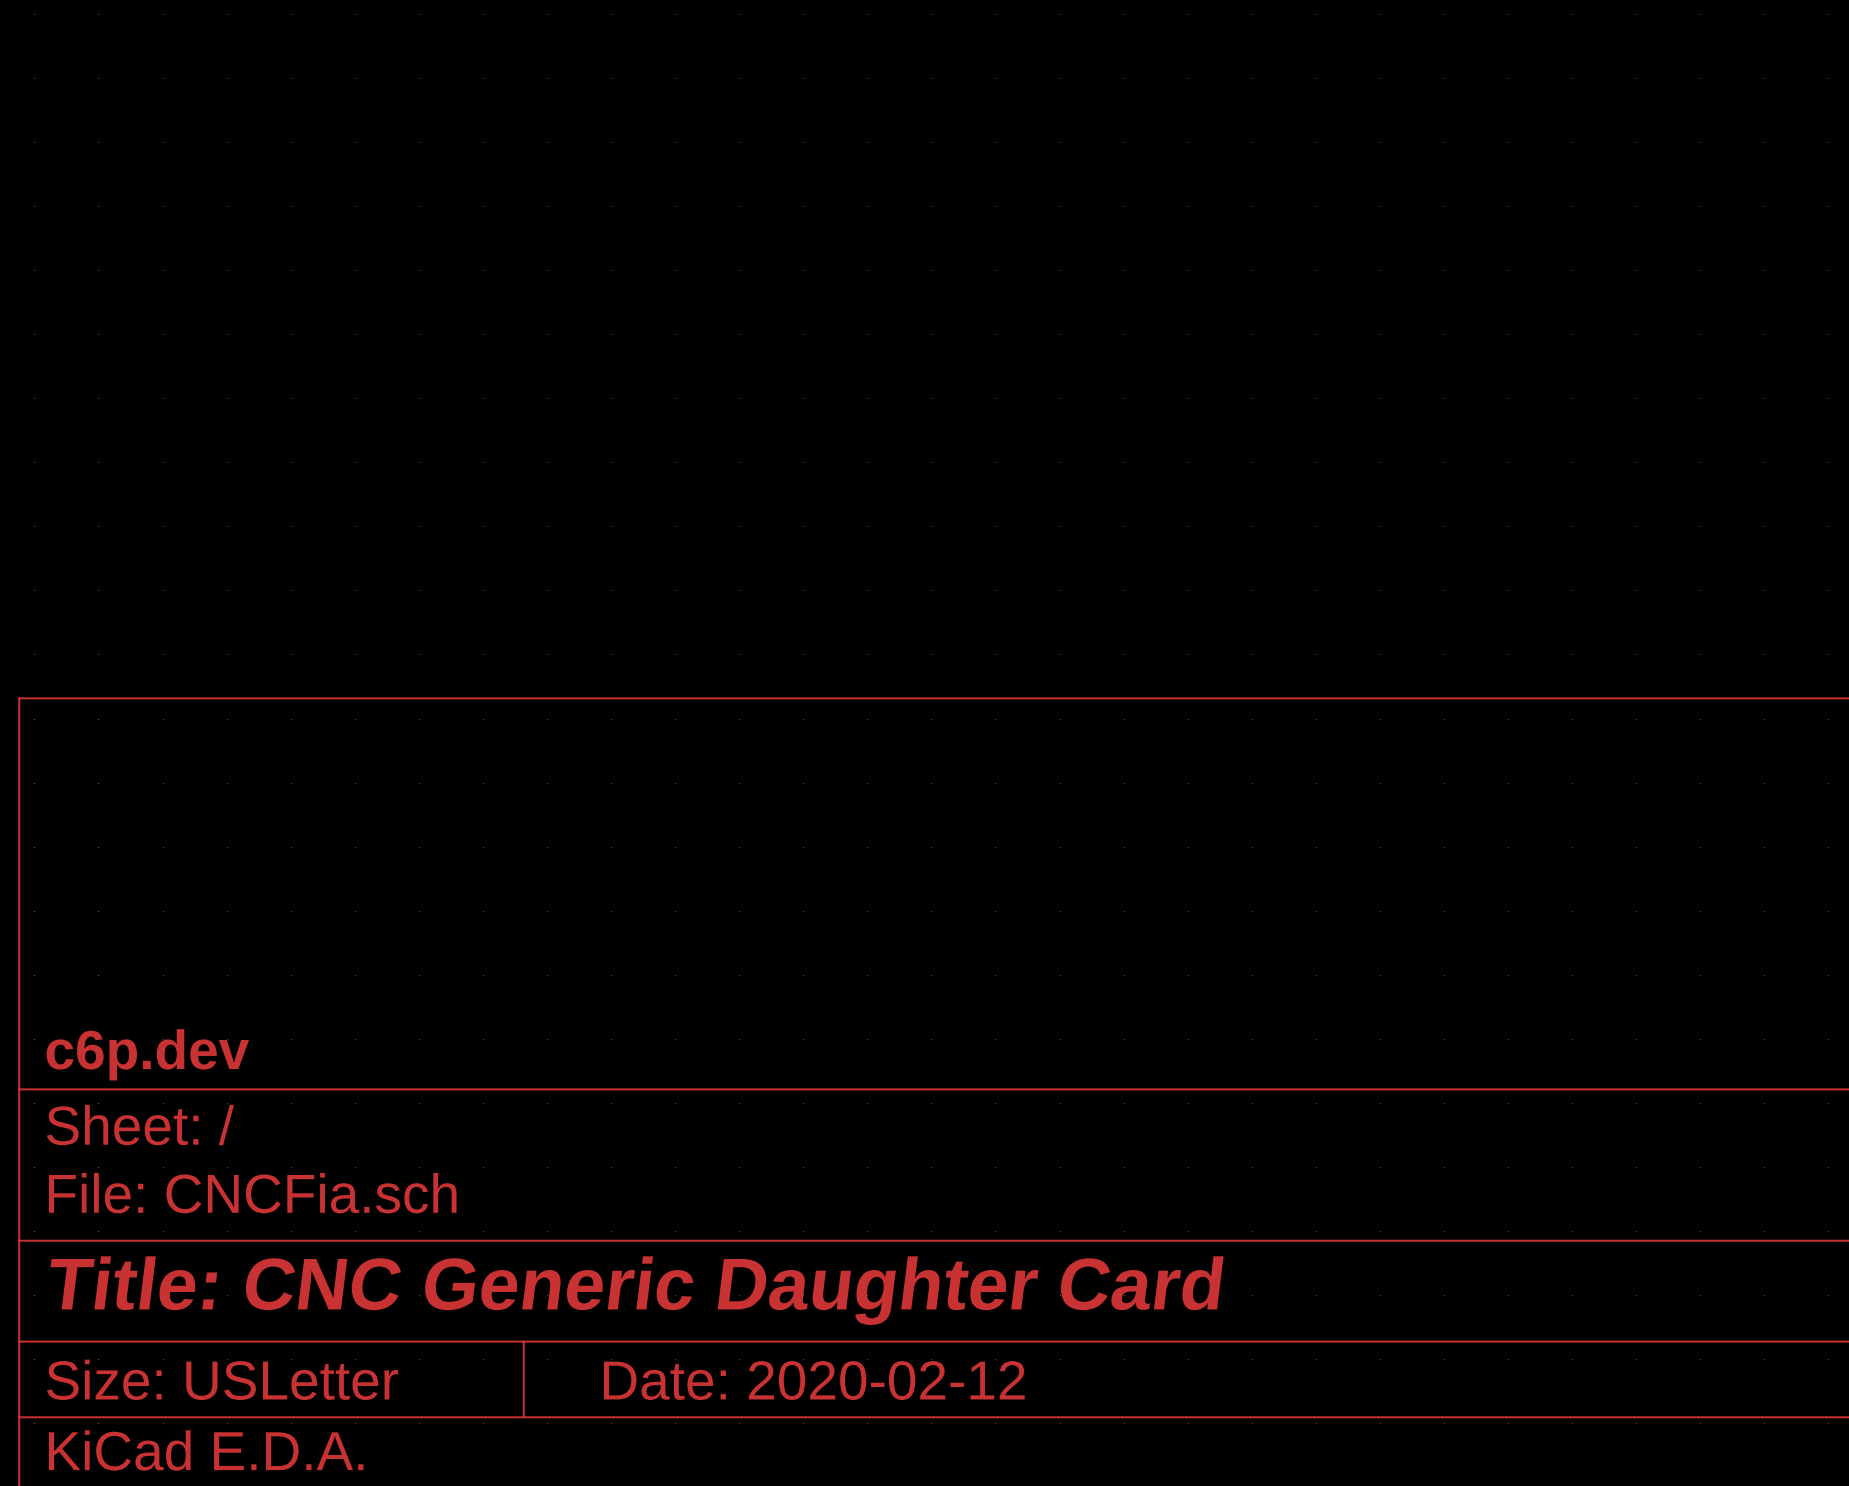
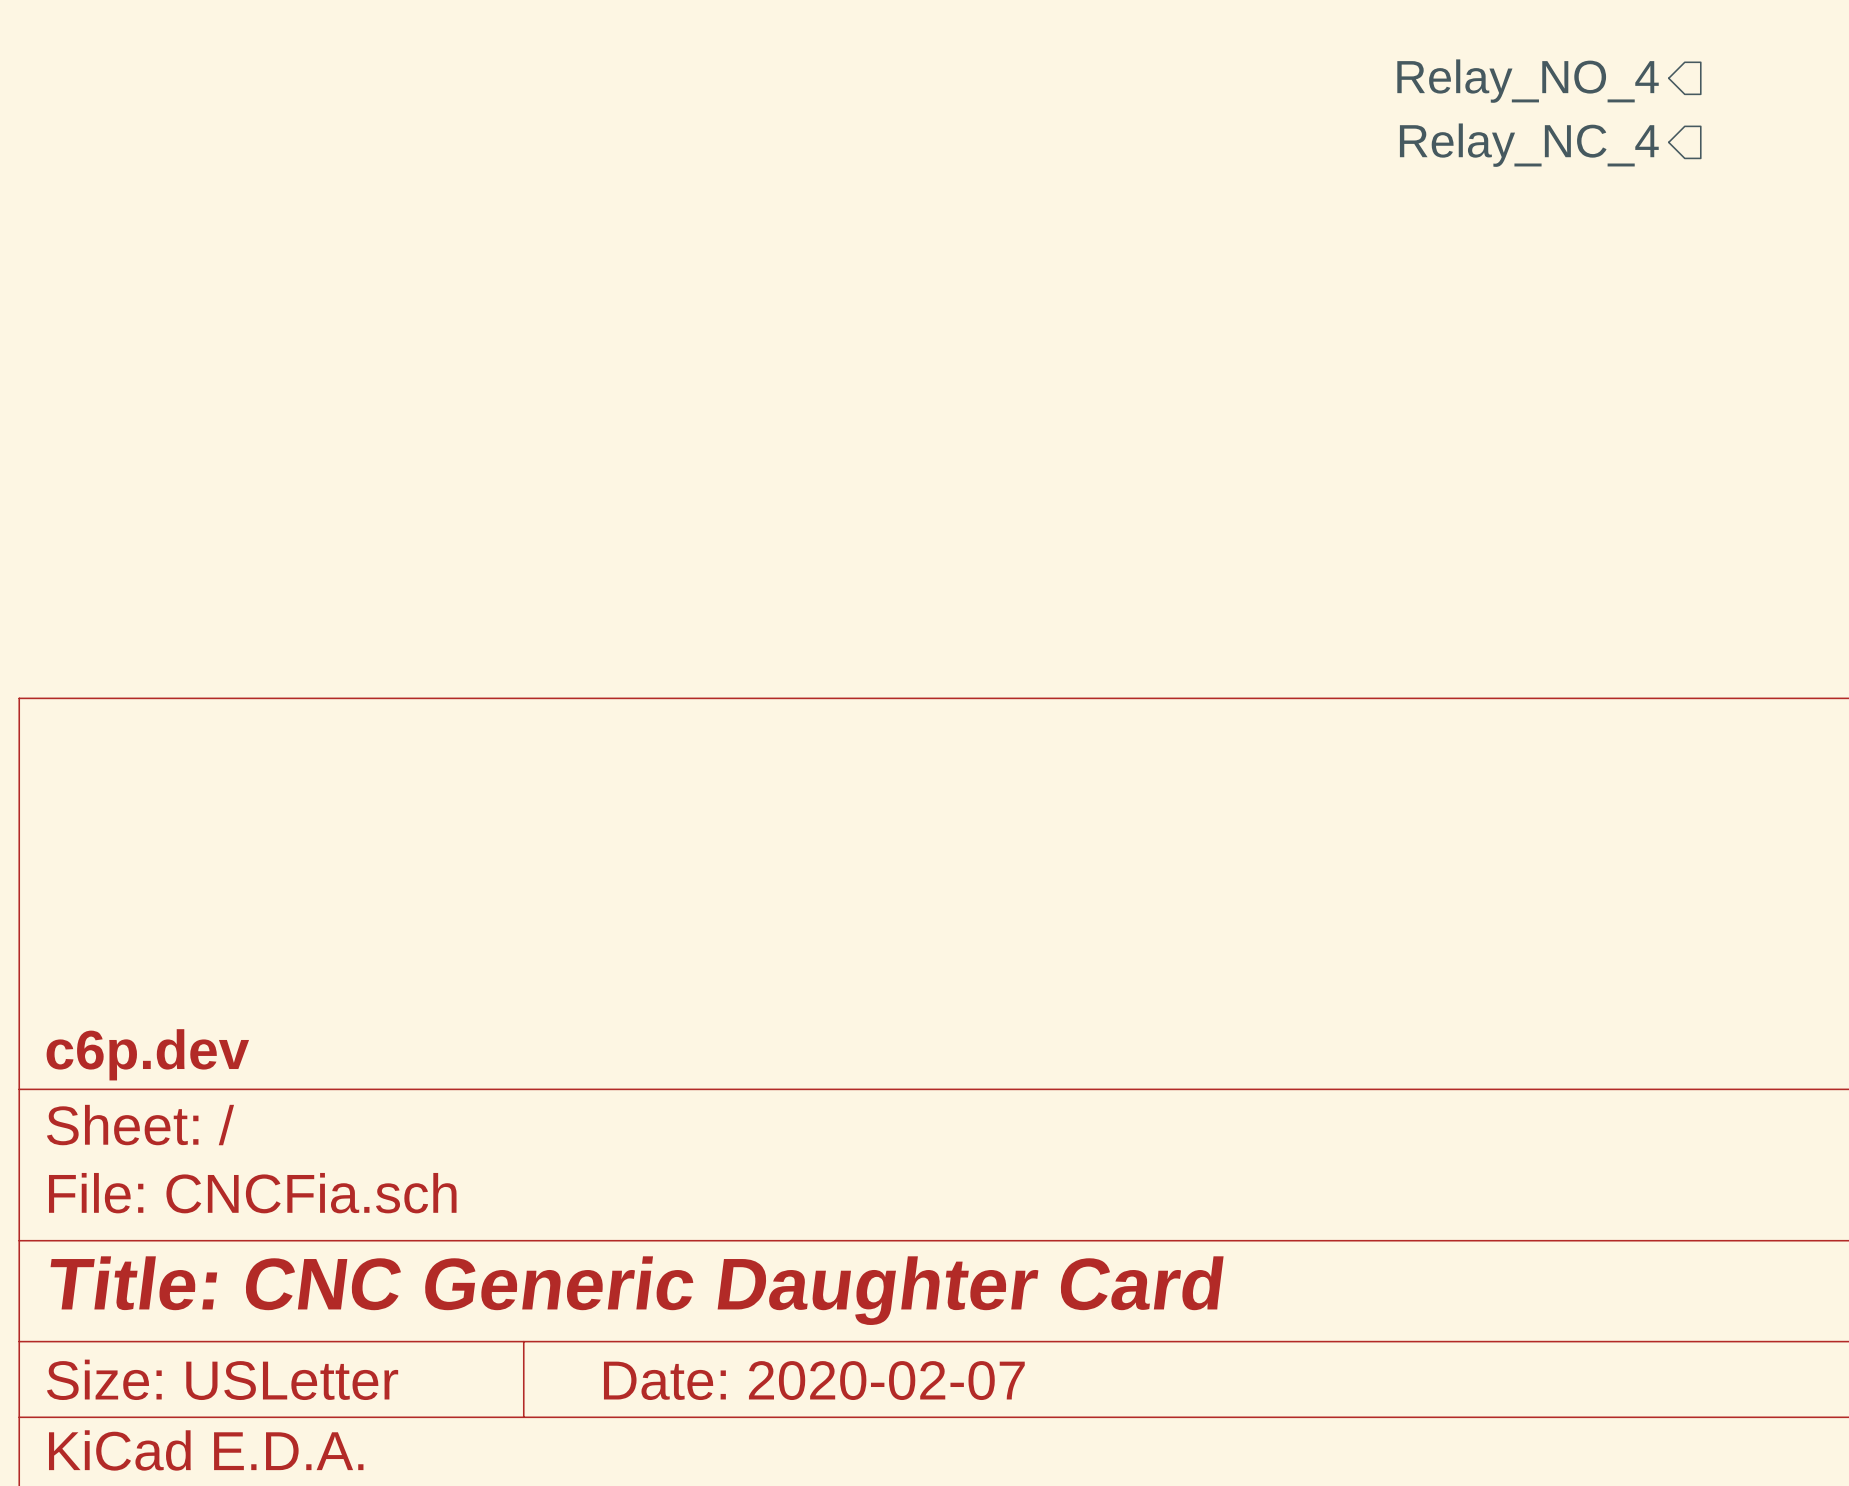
sheet pin: none -> Relay_NO_4 (1528, 81)
sheet pin: none -> Relay_NC_4 (1529, 145)
title block: Date: 2020-02-12 (814, 1380) -> Date: 2020-02-07 (814, 1380)

